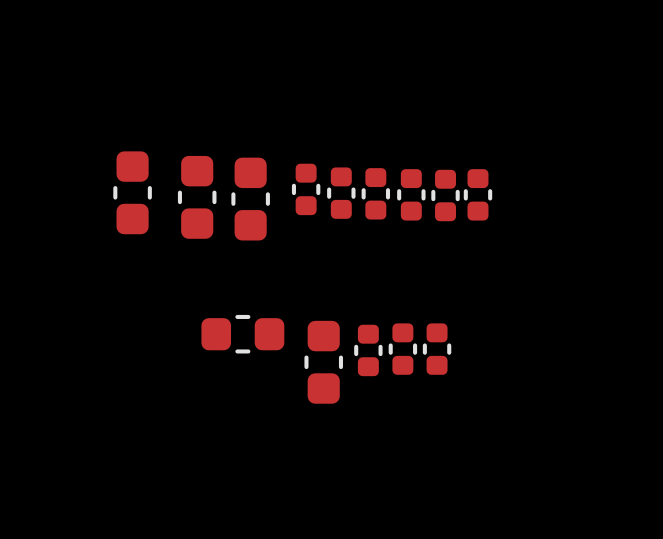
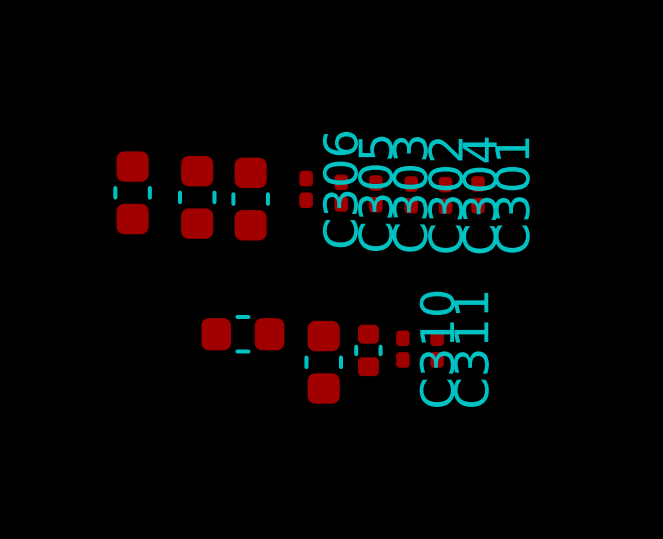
part: (306, 189) -> none
C306: none -> (306, 189)
part: (341, 193) -> none
C305: none -> (341, 193)
part: (375, 193) -> none
C303: none -> (375, 193)
part: (411, 194) -> none
C302: none -> (411, 194)
part: (477, 194) -> none
C301: none -> (477, 194)
part: (445, 195) -> none
C304: none -> (445, 195)
part: (402, 349) -> none
C310: none -> (402, 349)
part: (437, 349) -> none
C311: none -> (437, 349)

